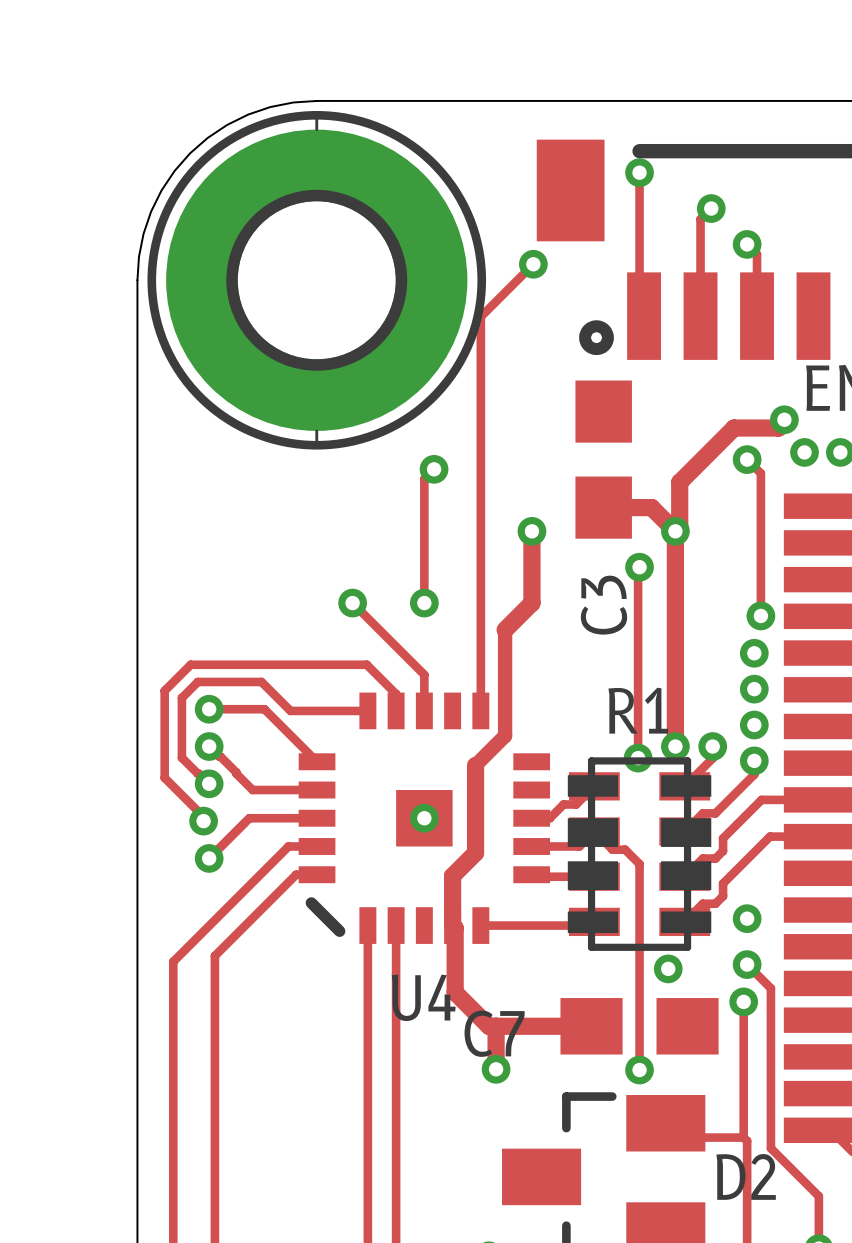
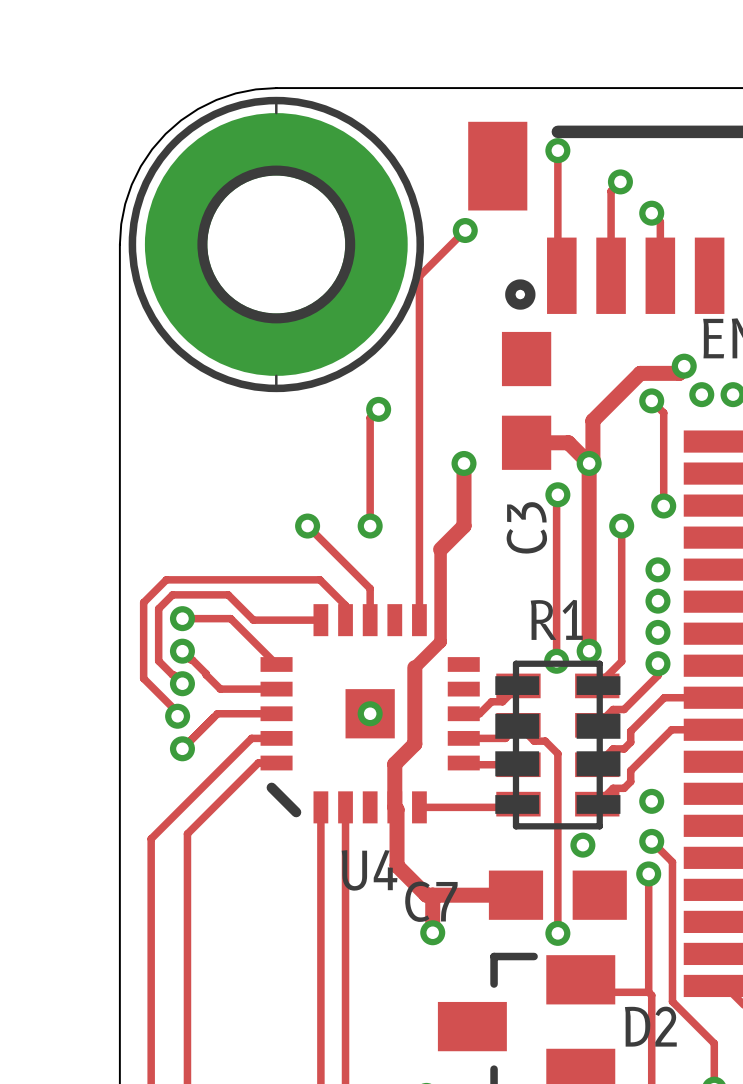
track: (760, 580) (760, 615) -> none
via: none -> (663, 506)
track: none -> (621, 526) (621, 651)
via: none -> (621, 526)
via: (760, 615) -> none
via: (712, 746) -> none

